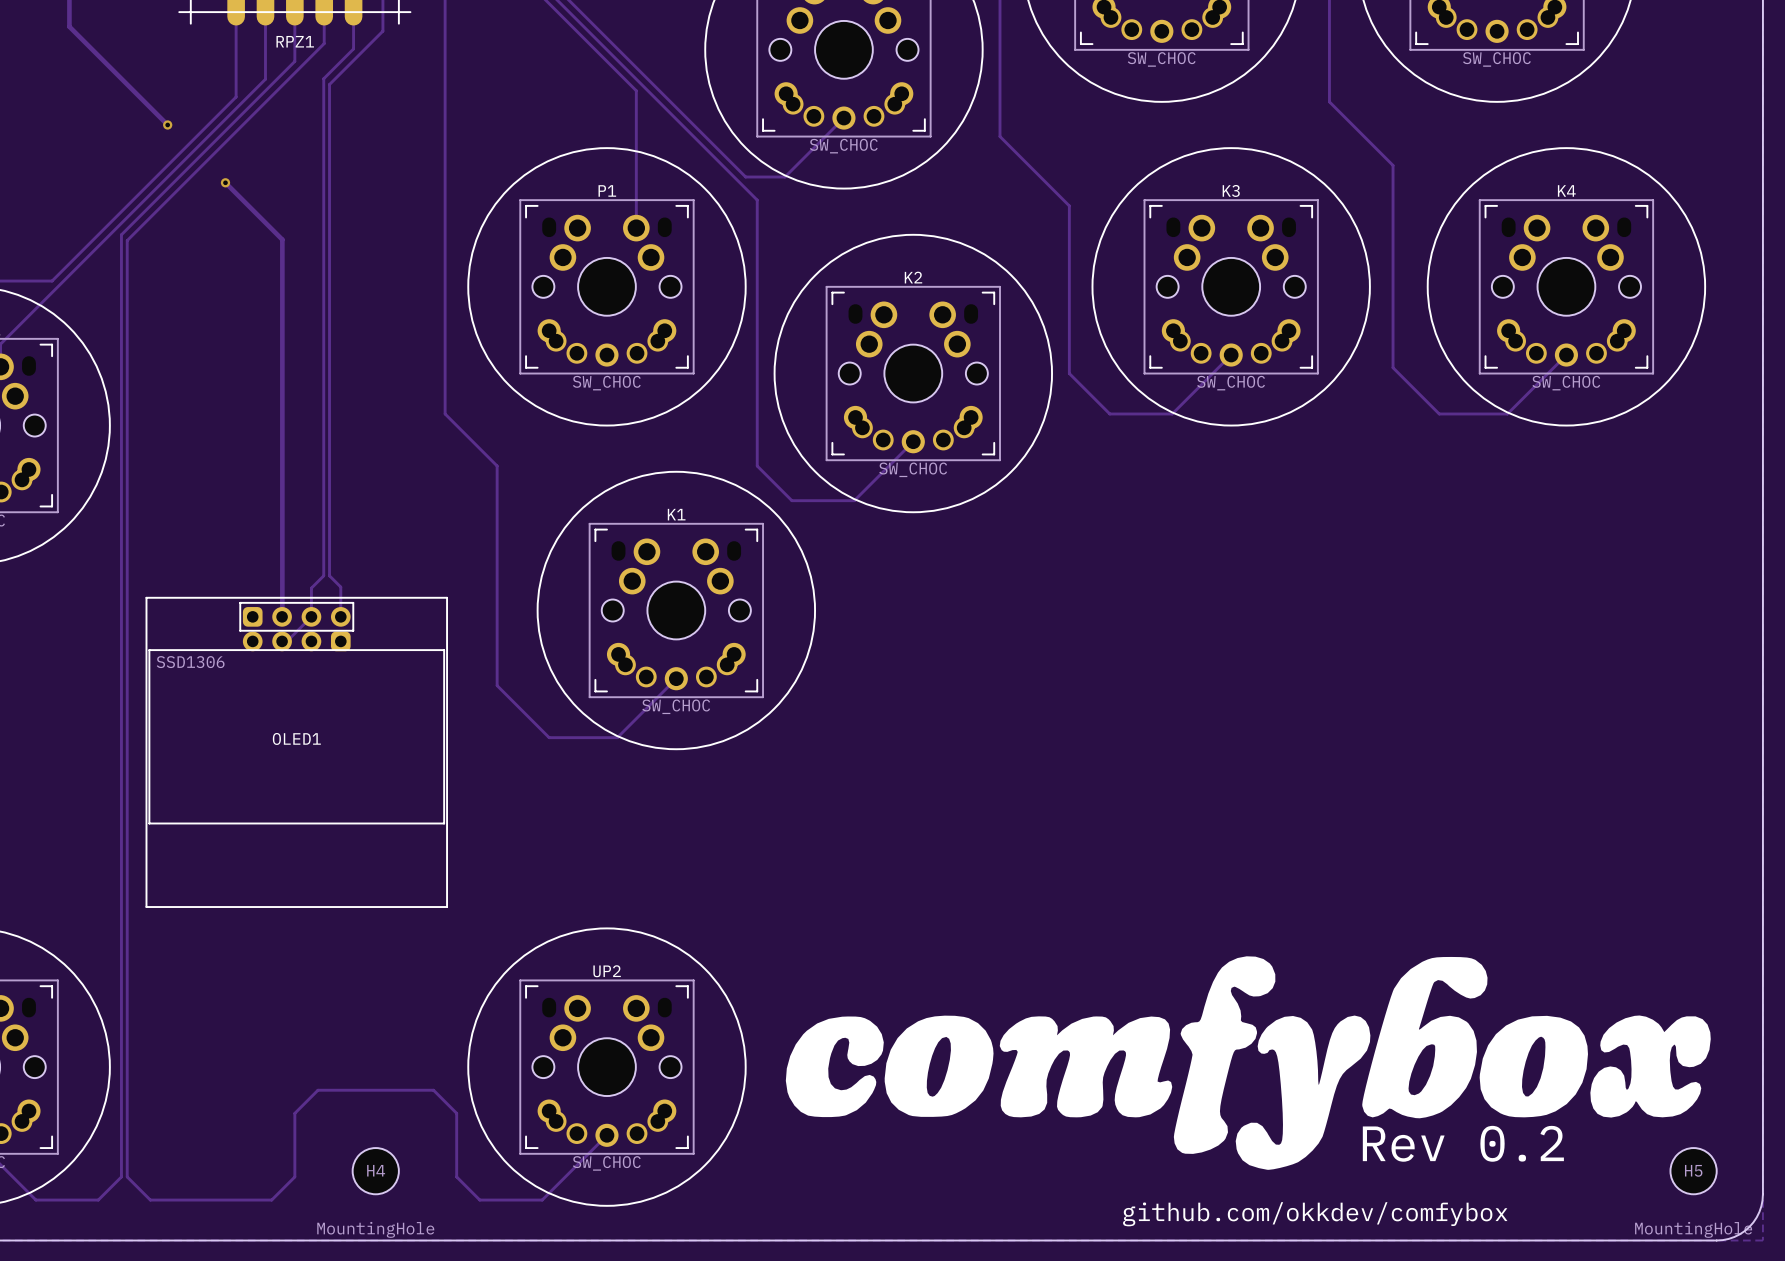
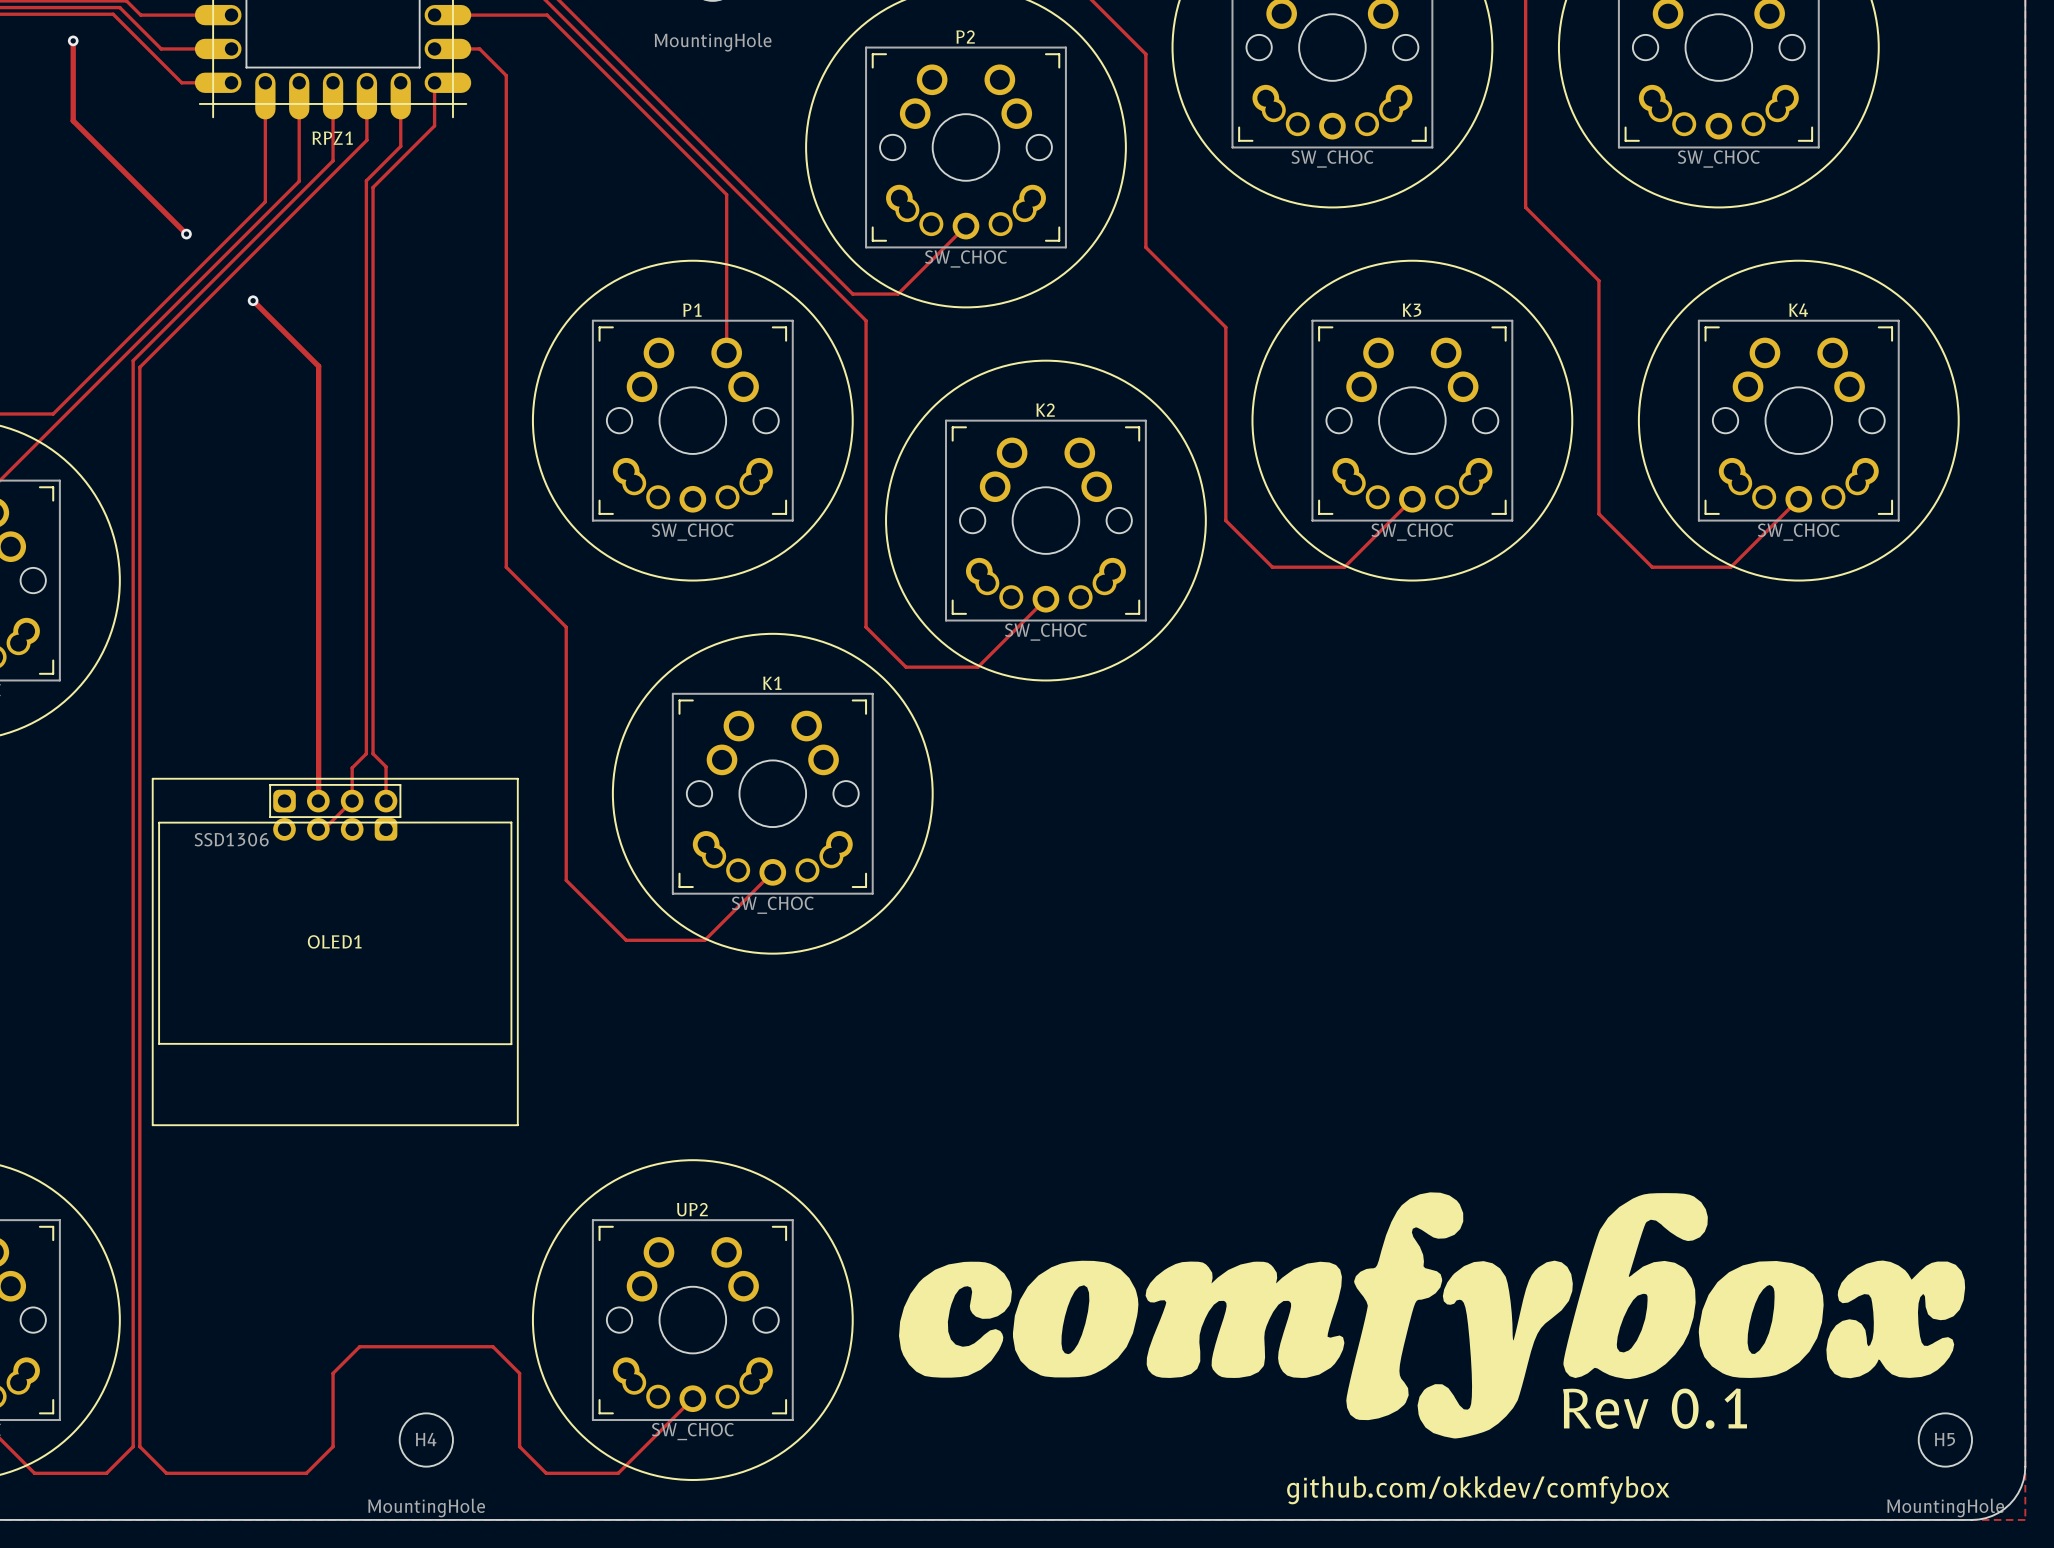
OLED1 footprint: [145, 597, 448, 908] -> [151, 777, 519, 1127]
text: Rev 0.2 (1463, 1143) -> Rev 0.1 (1655, 1408)

